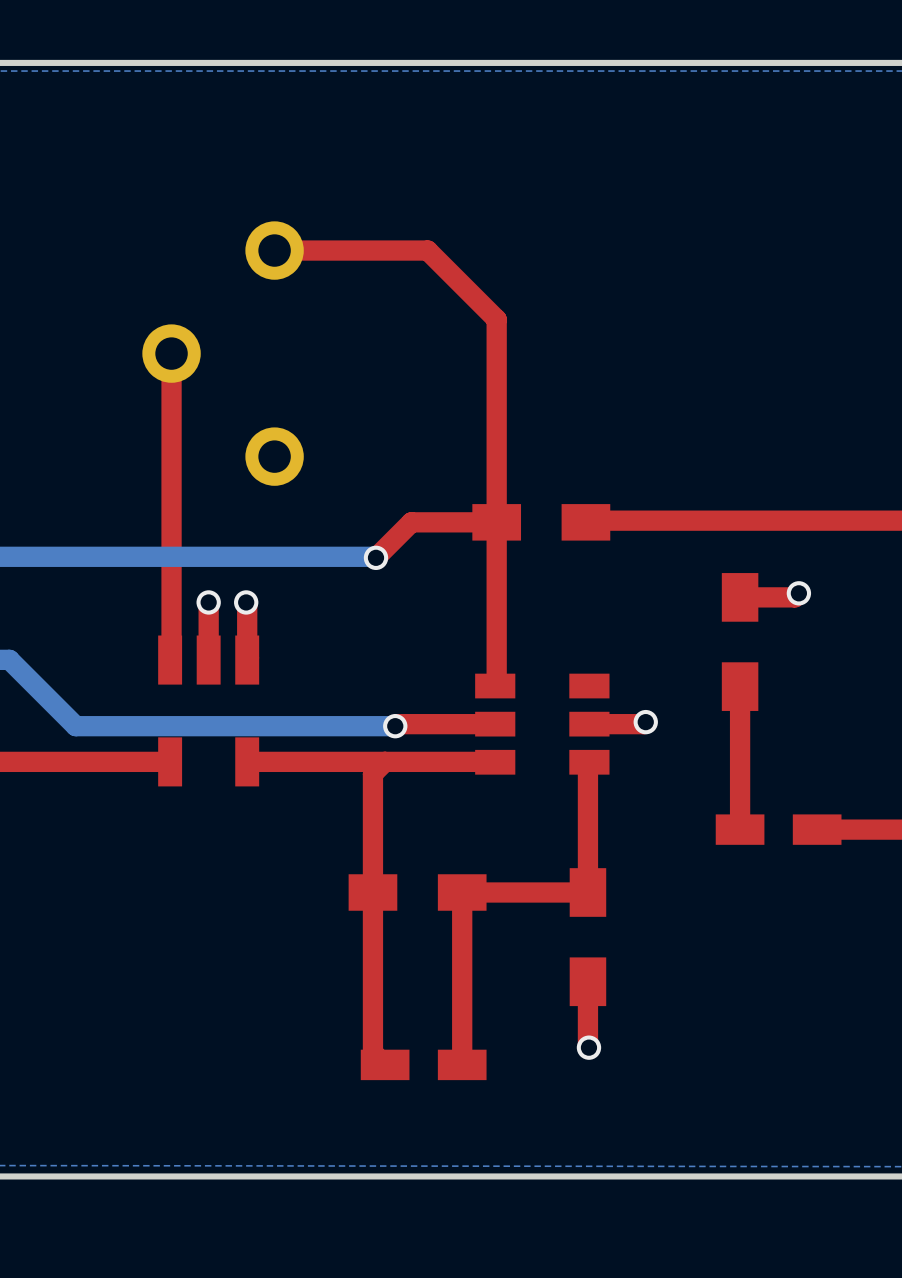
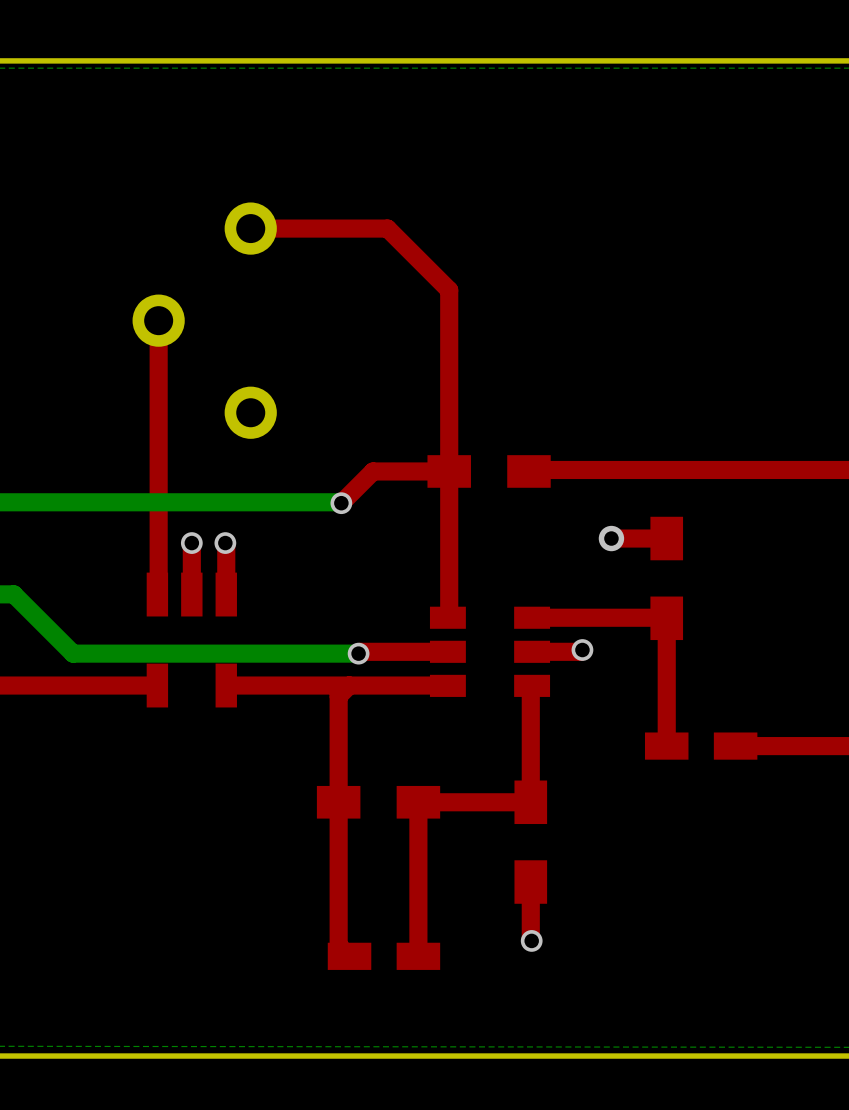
top track: (798, 593) (794, 597) (740, 597) -> (611, 538) (666, 538)
via: (798, 593) -> none
via: none -> (611, 538)
top track: none -> (532, 617) (666, 618)

